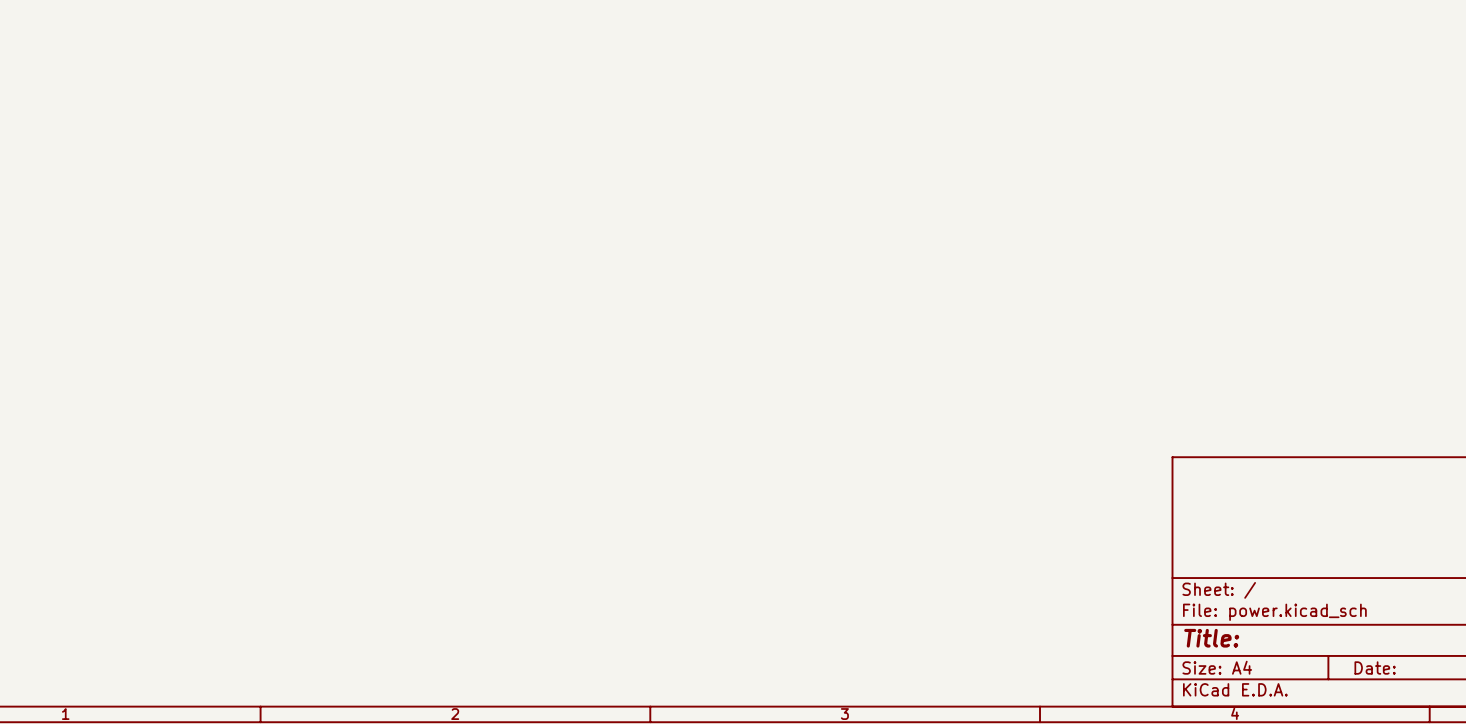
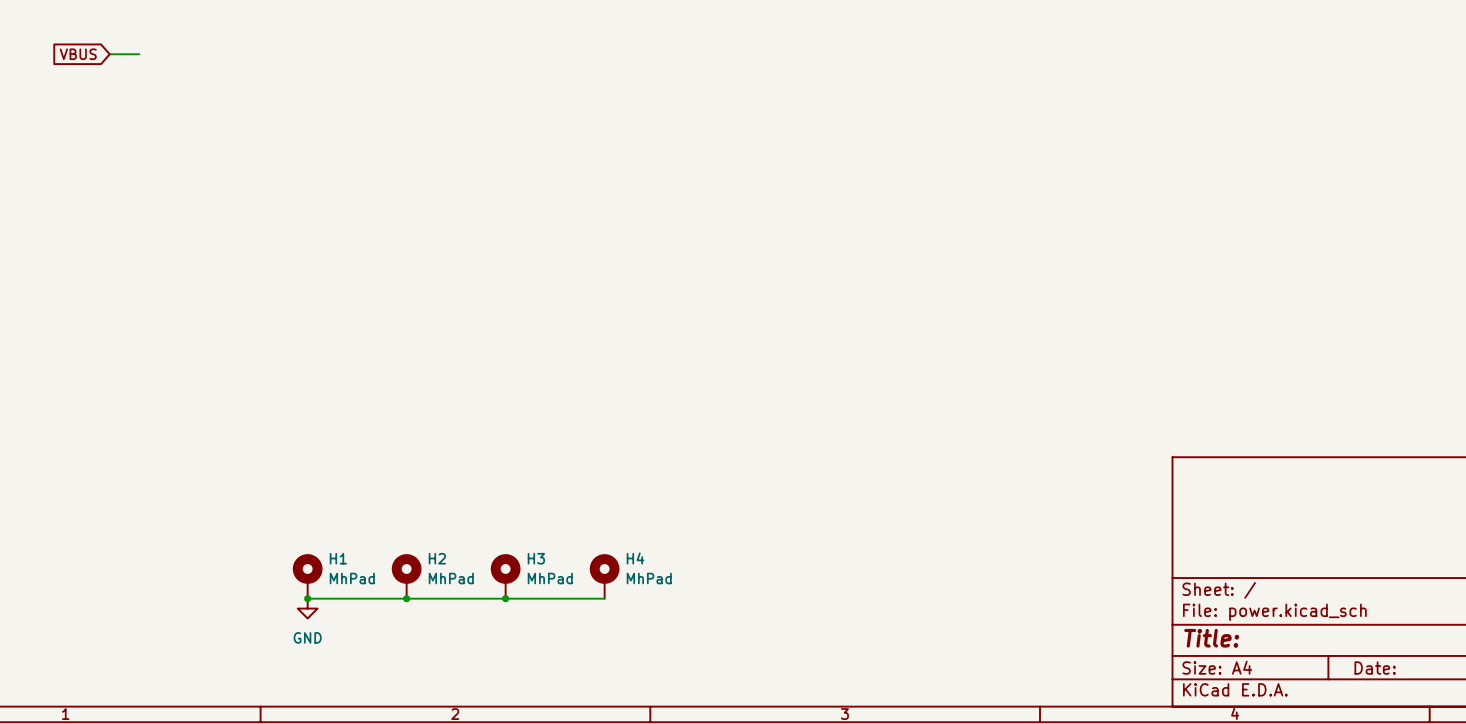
global label: none -> VBUS (78, 54)
wire: none -> (109, 54) (139, 54)
H1: none -> MhPad (307, 576)
H2: none -> MhPad (406, 576)
H3: none -> MhPad (505, 576)
H4: none -> MhPad (604, 576)
wire: none -> (307, 598) (604, 598)
junction: none -> (307, 598)
junction: none -> (406, 598)
junction: none -> (505, 598)
power symbol: none -> GND (307, 608)

